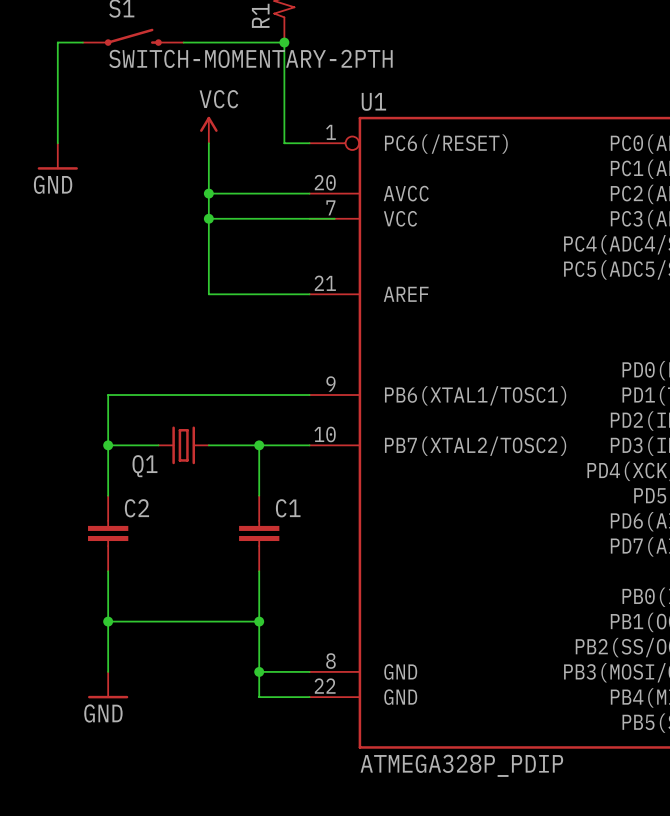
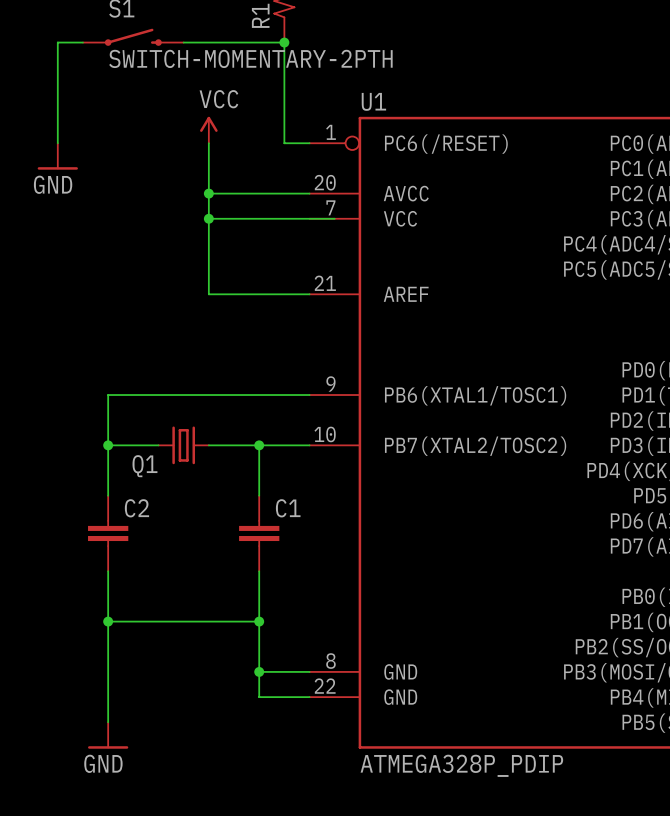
power symbol position: GND (108, 685) -> GND (108, 735)

